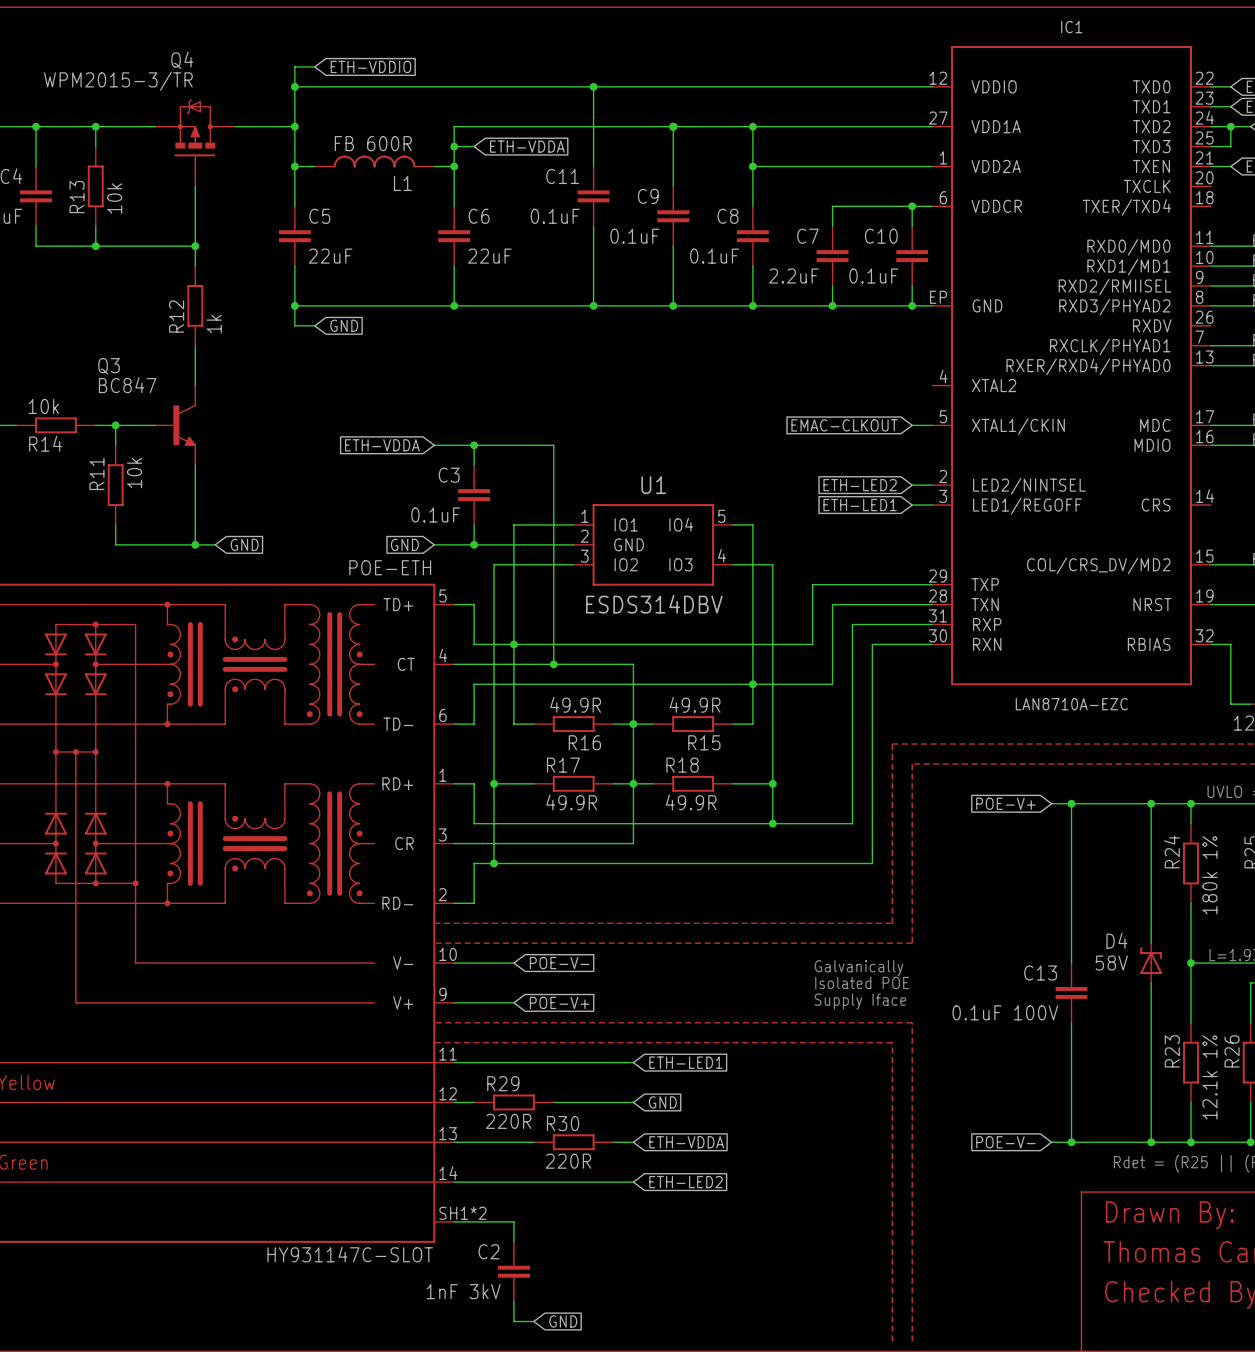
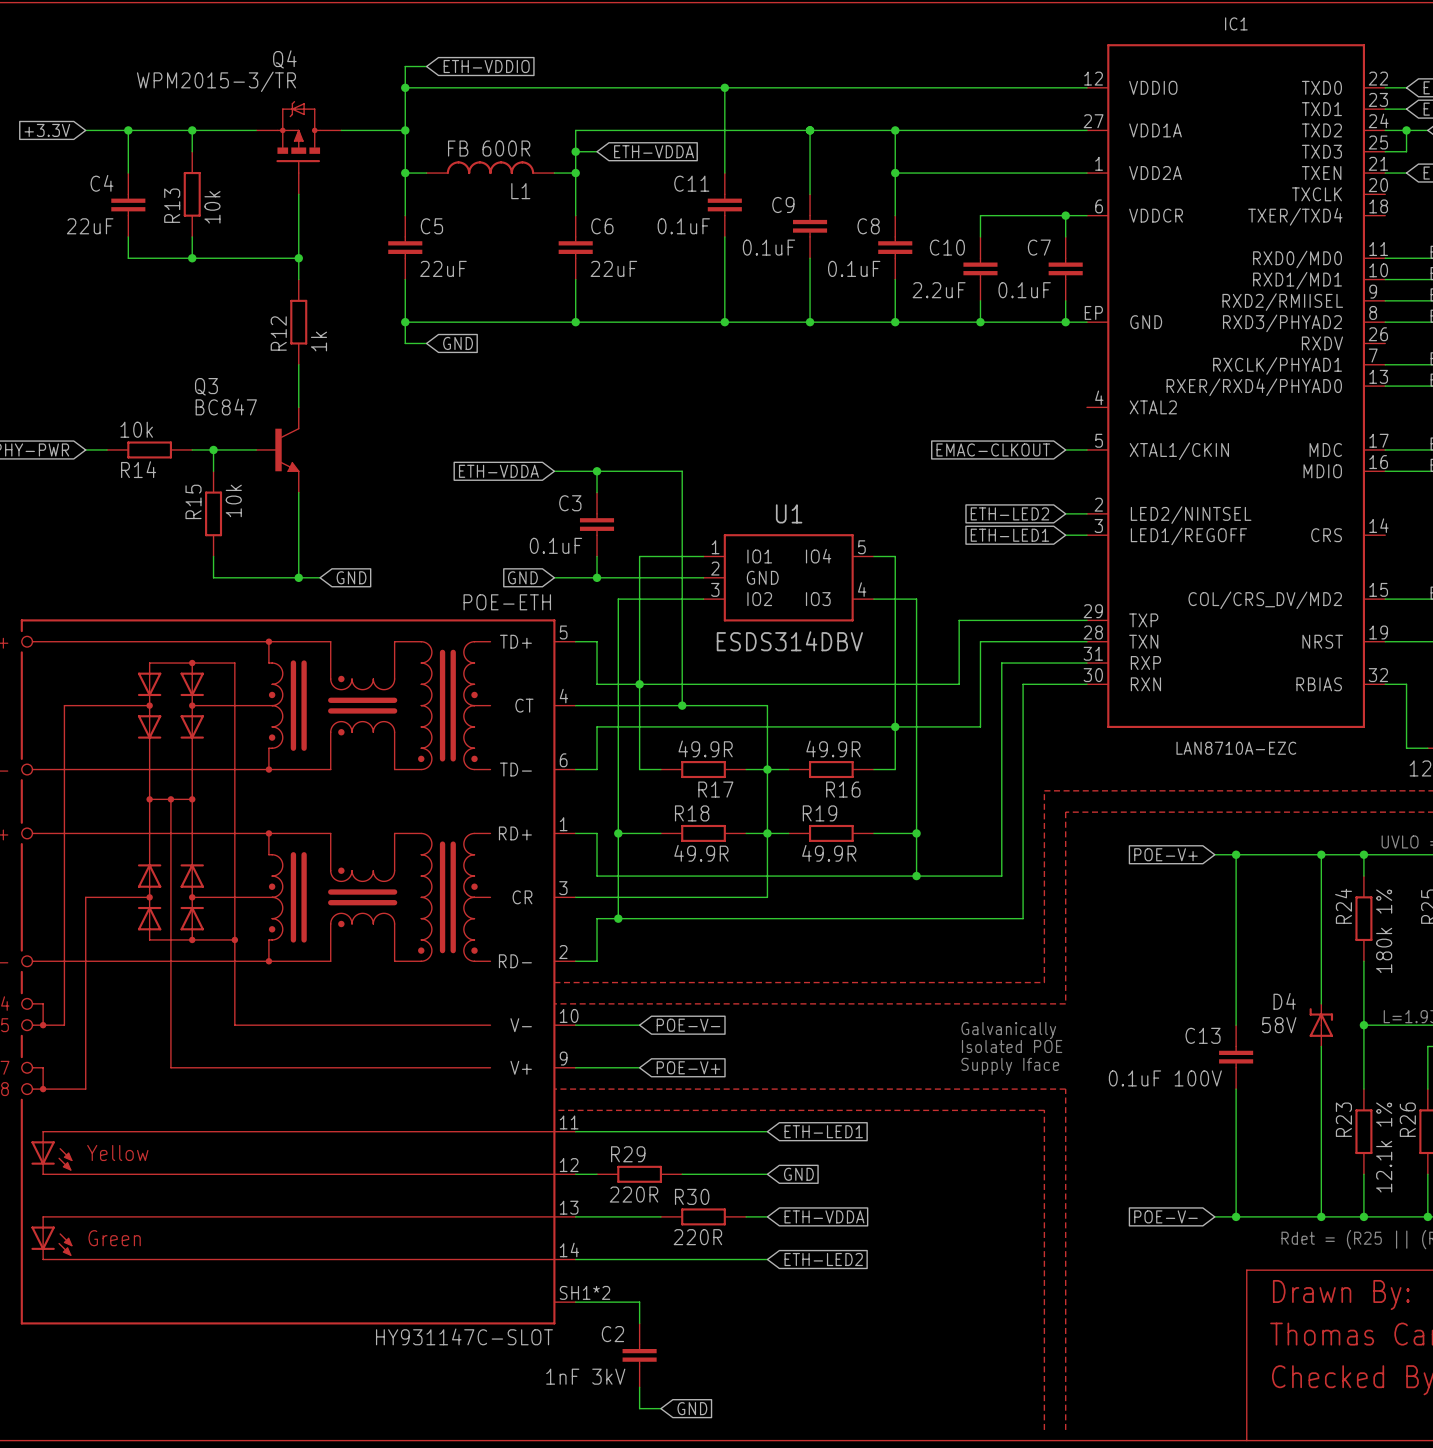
C7 name: C7 (807, 236) -> C10 (947, 247)
C10 name: C10 (881, 236) -> C7 (1039, 247)
R11 name: R11 (96, 473) -> R15 (193, 501)
R16 name: R16 (584, 742) -> R17 (715, 789)
R15 name: R15 (704, 742) -> R16 (843, 789)
R17 name: R17 (563, 765) -> R18 (692, 813)
R18 name: R18 (682, 765) -> R19 (819, 813)

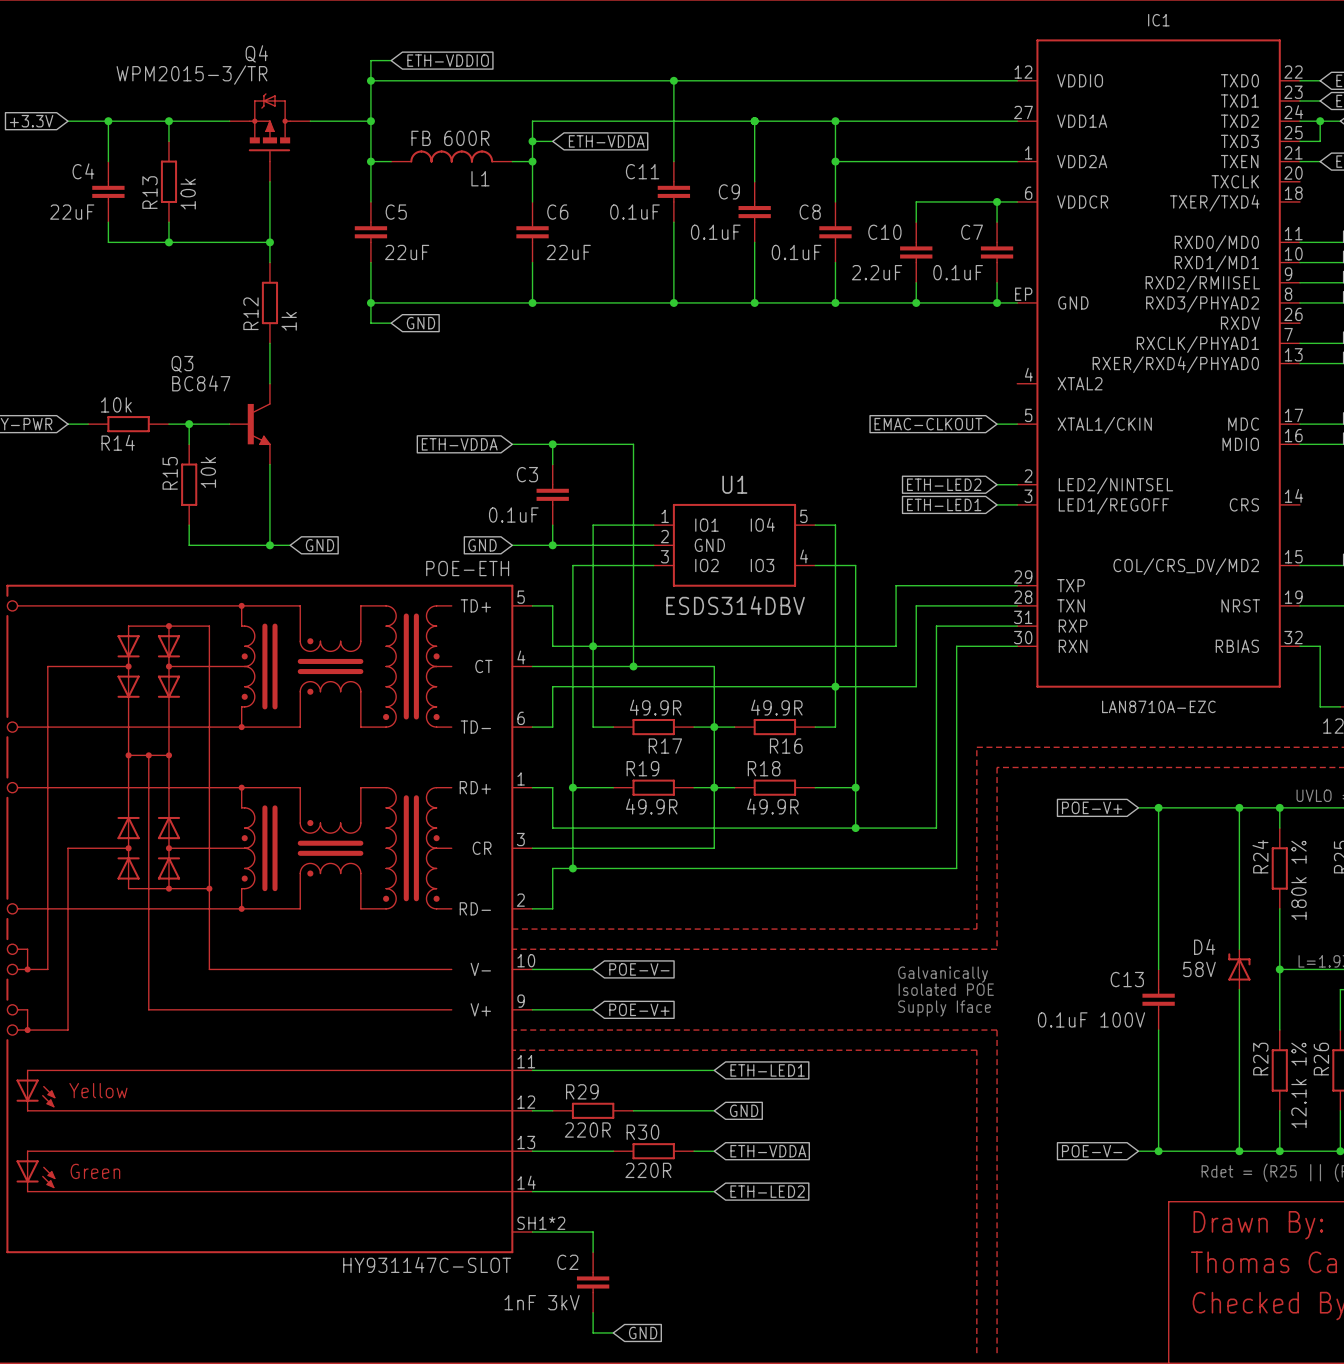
R18 name: R18 (692, 813) -> R19 (642, 768)
R19 name: R19 (819, 813) -> R18 (764, 768)

